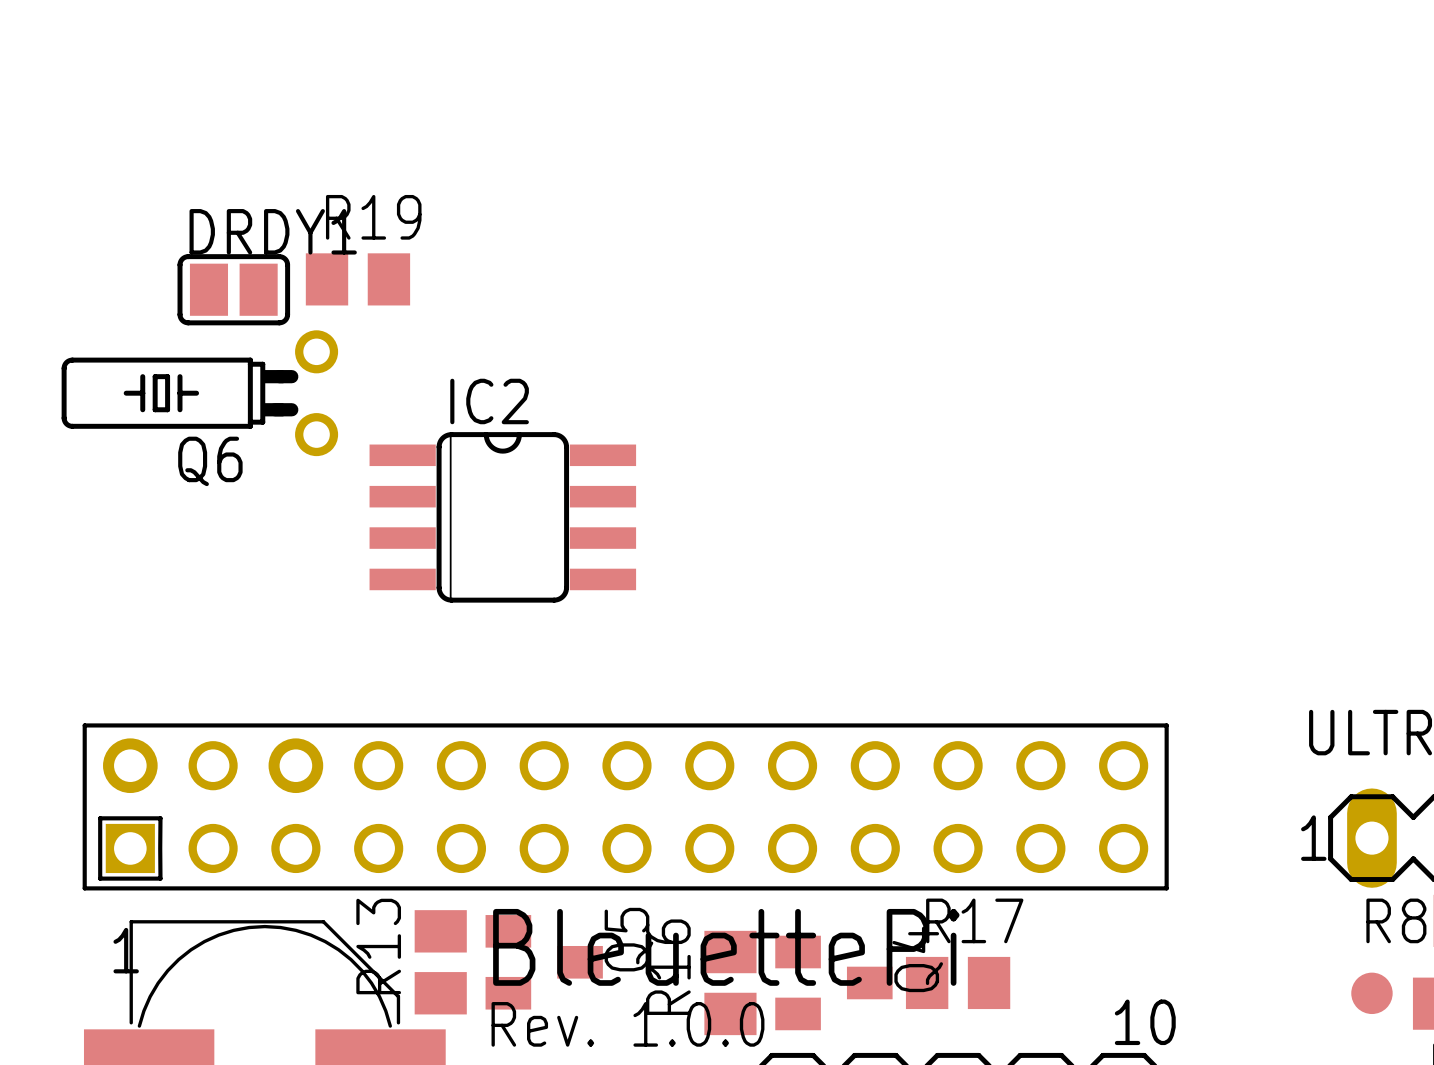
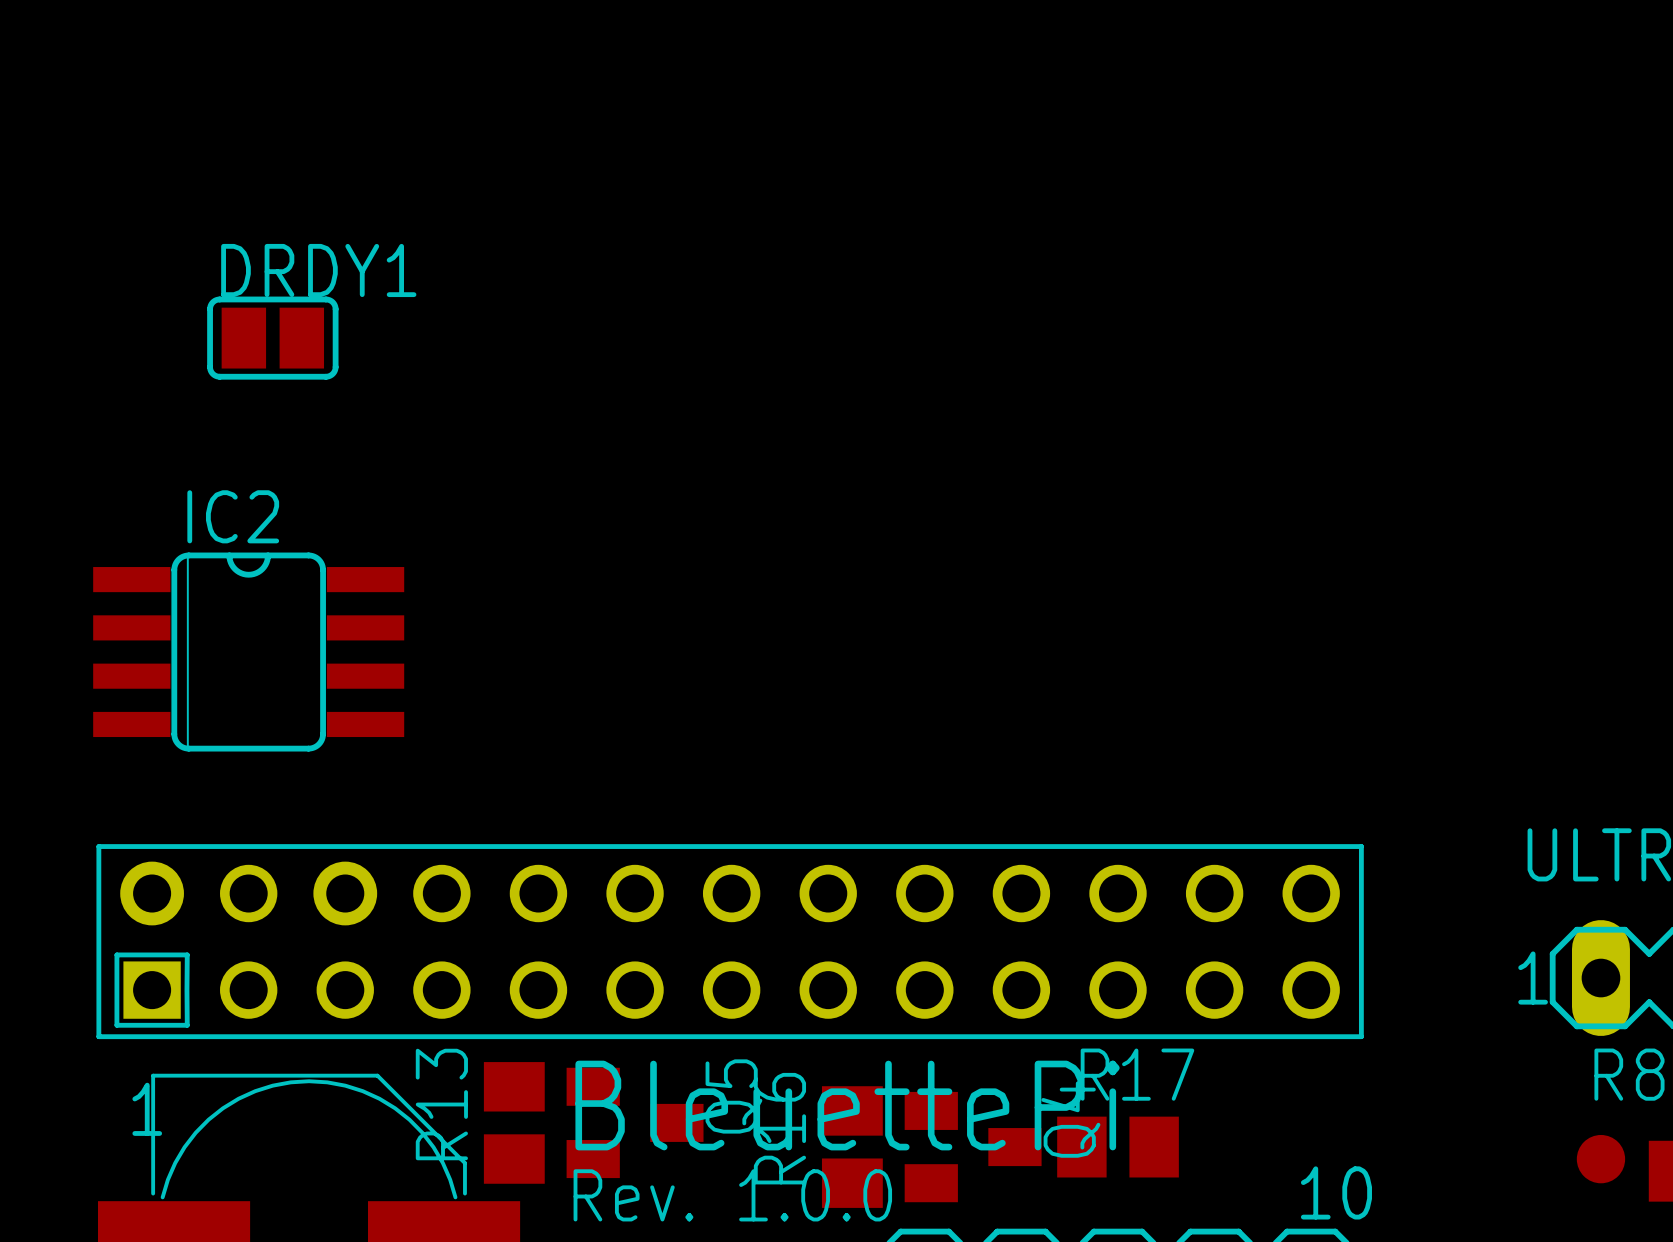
R19: (357, 279) -> none
Q6: (199, 393) -> none
IC2 position: (502, 517) -> (248, 652)

